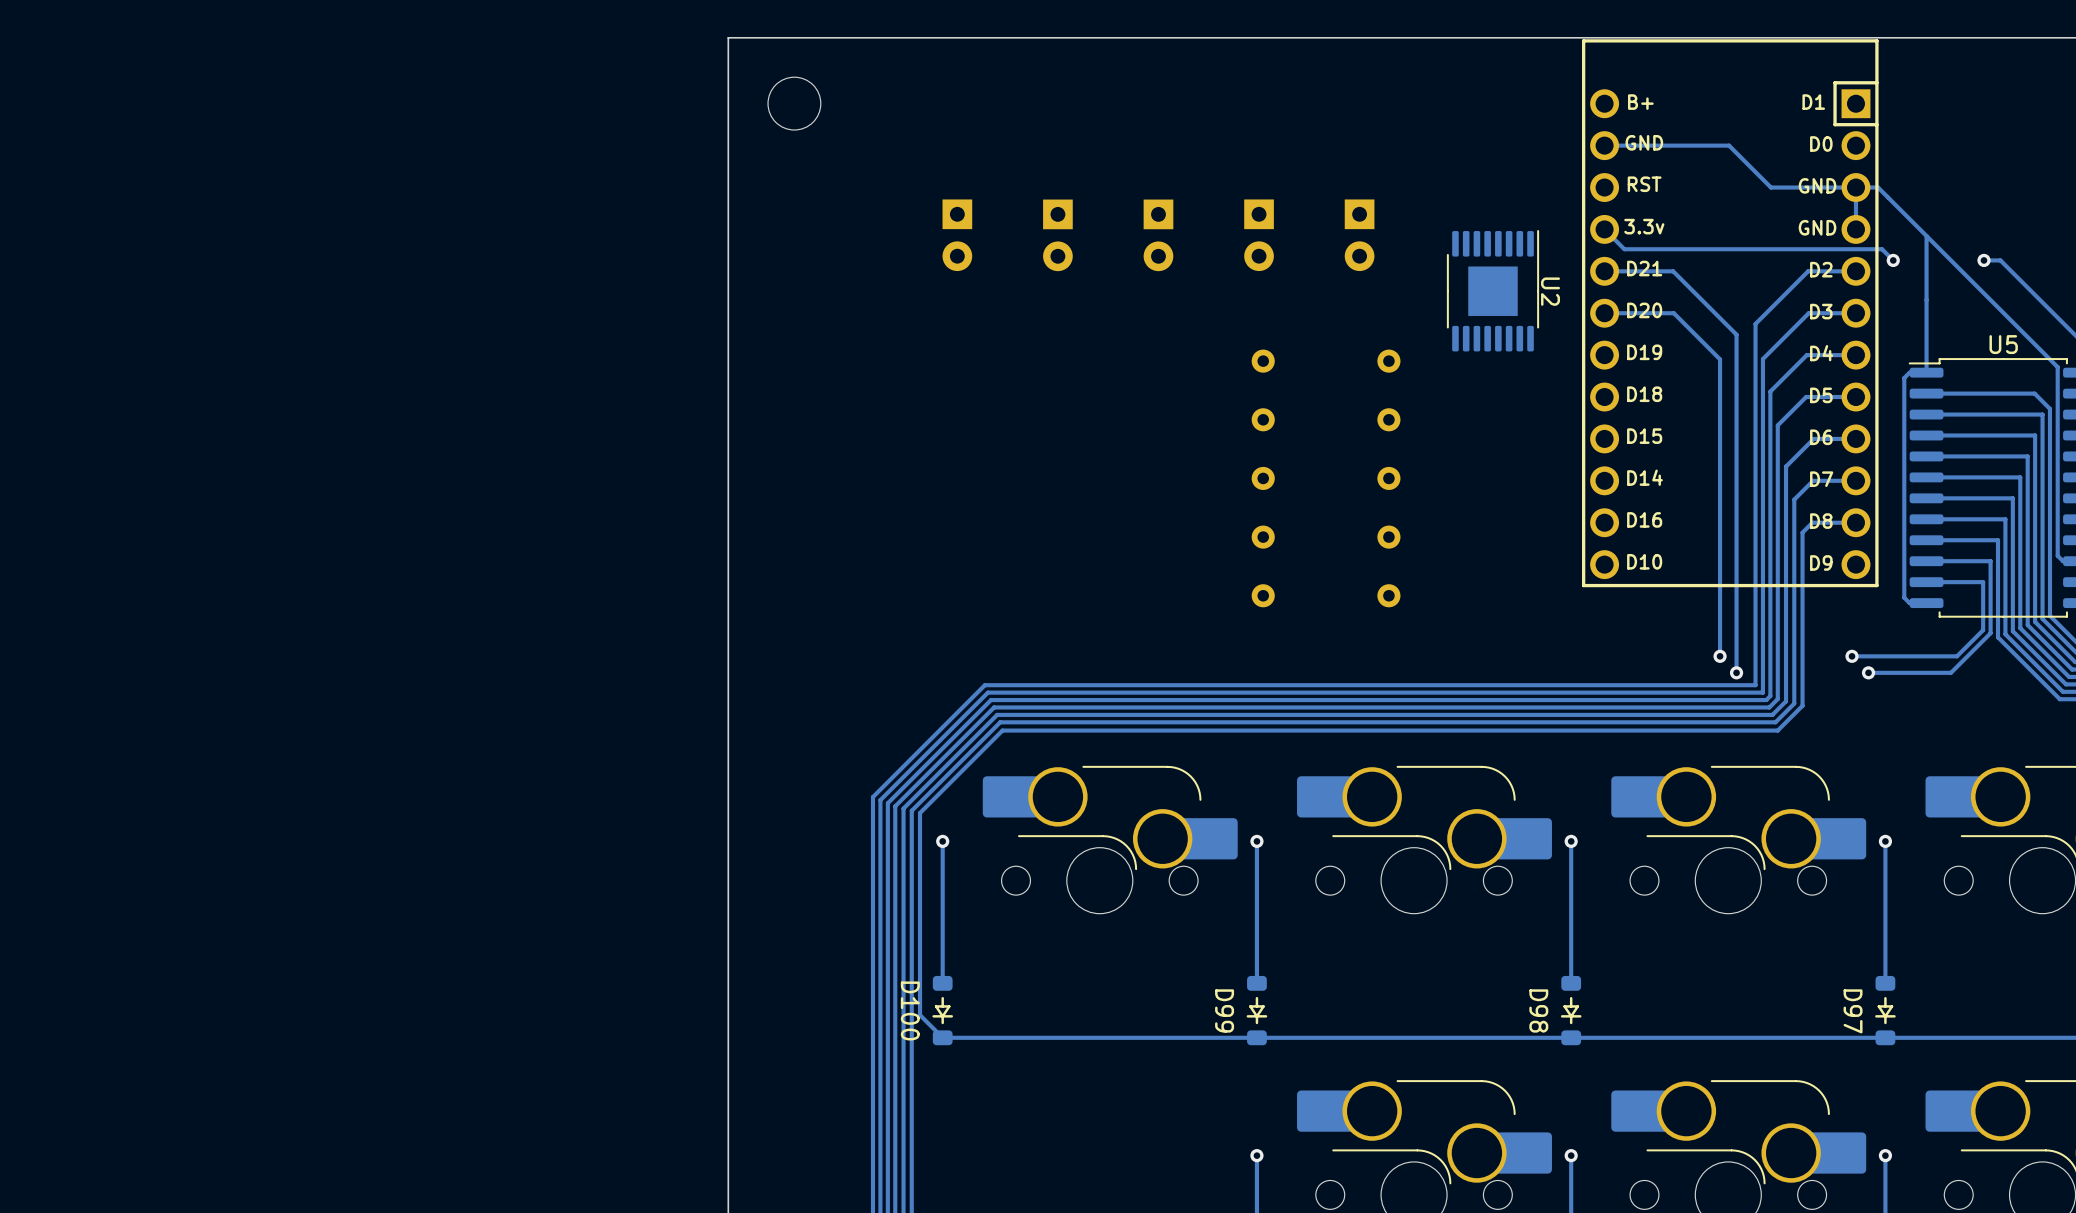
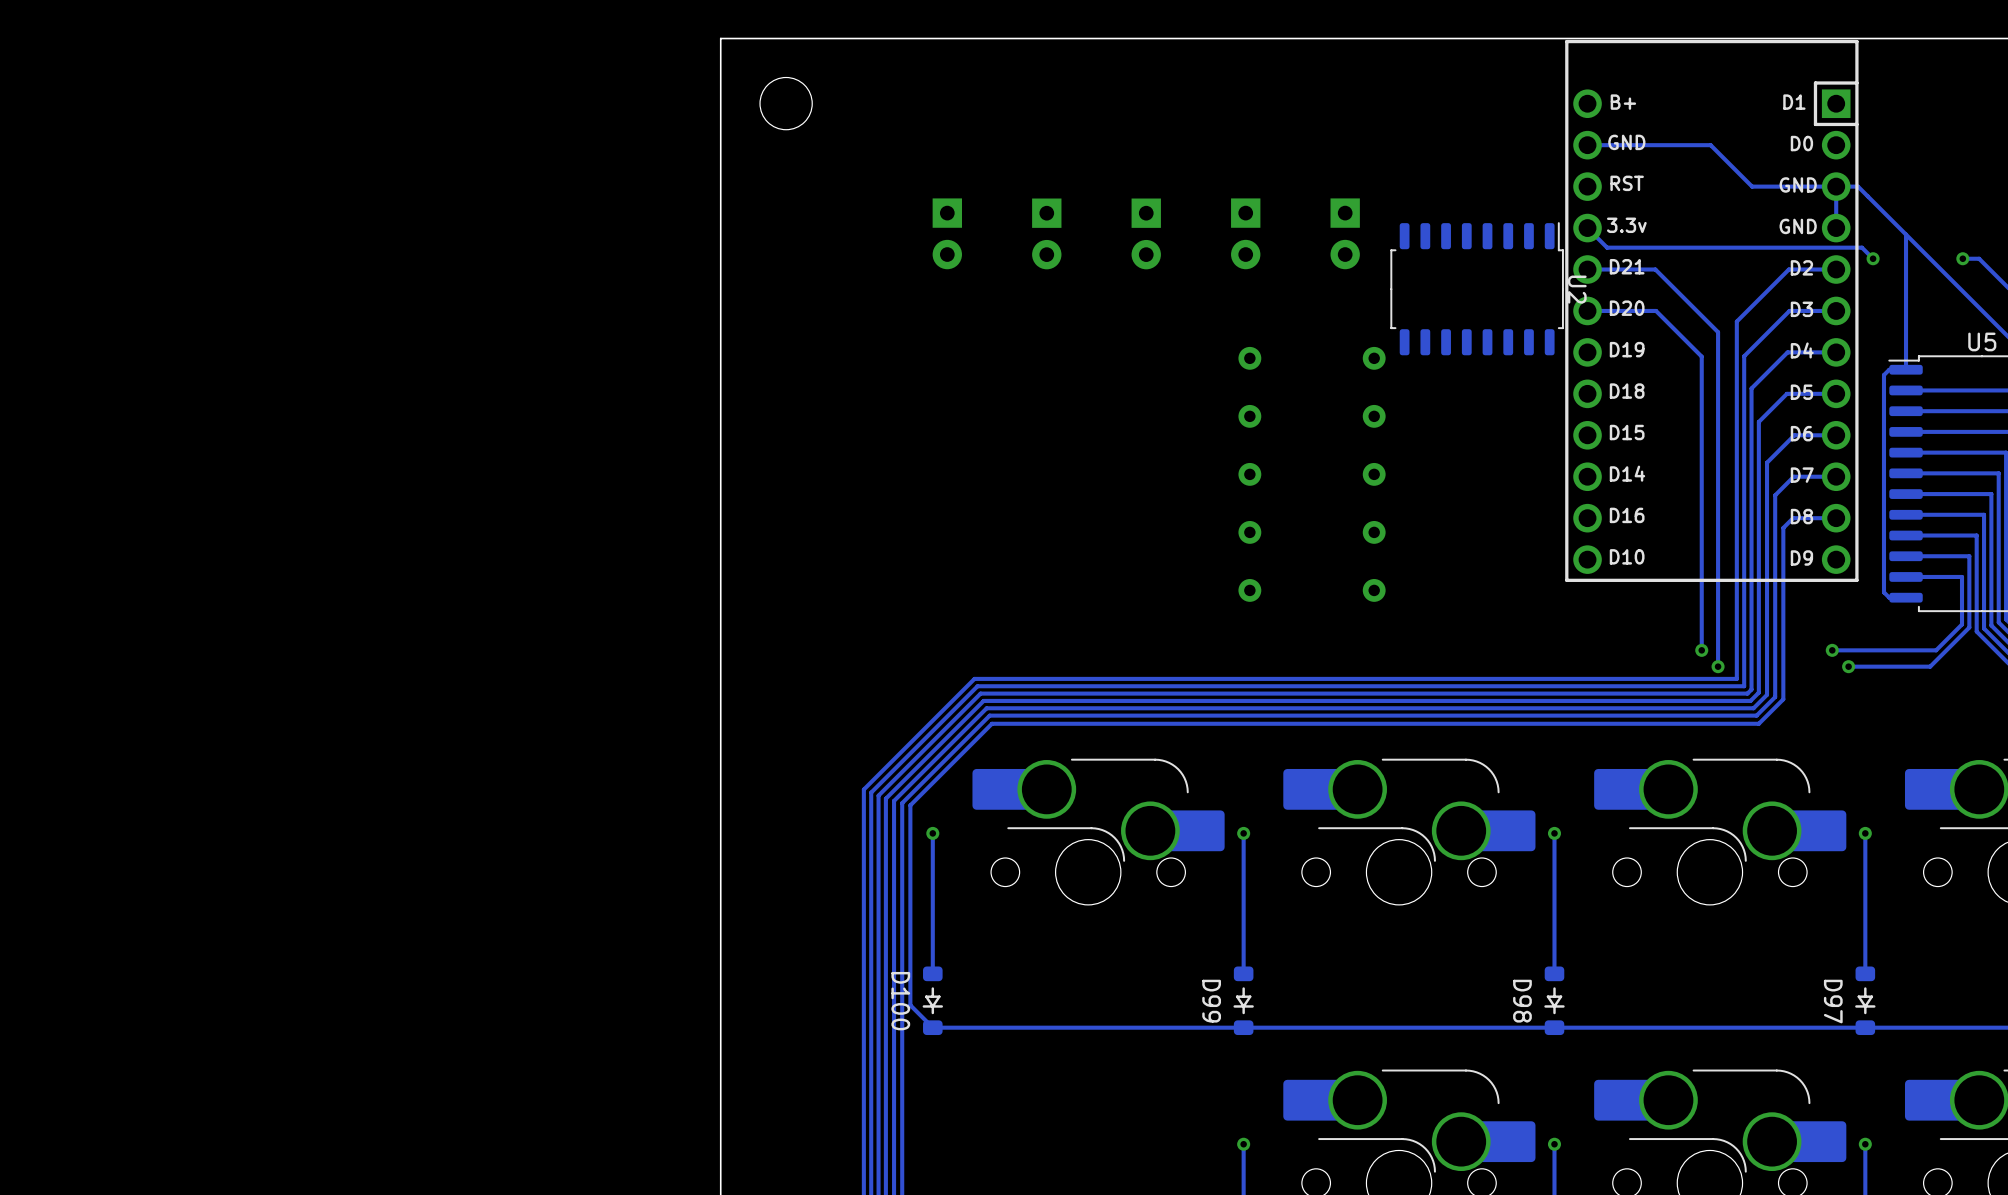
U2 footprint: [1446, 230, 1540, 352] -> [1390, 222, 1564, 356]
U2 name position: U2 (1550, 291) -> U2 (1577, 289)

